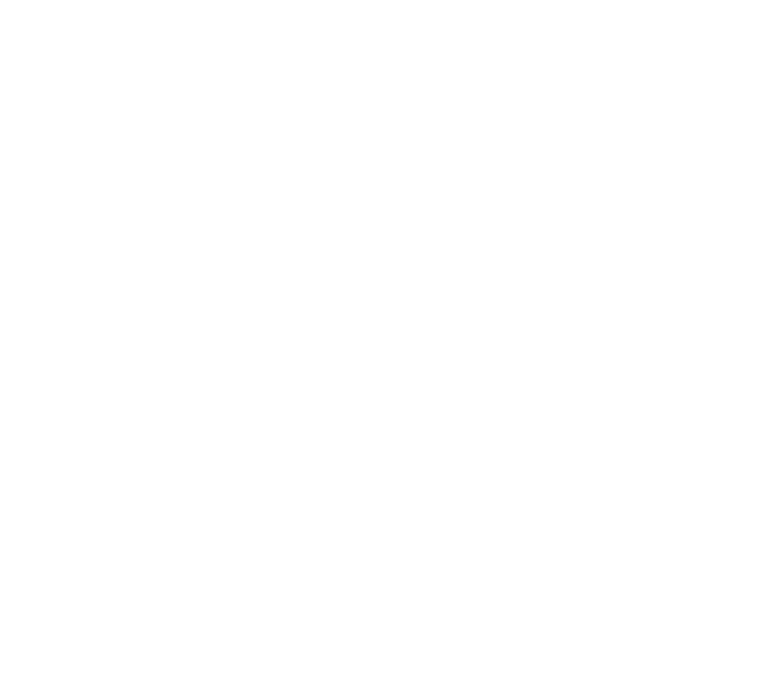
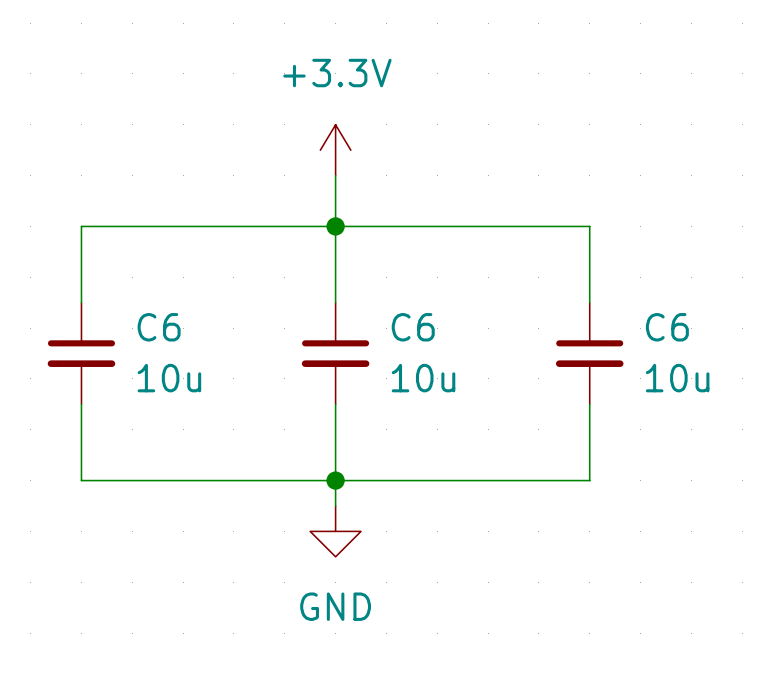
power symbol: none -> +3.3V (335, 150)
wire: none -> (335, 175) (335, 302)
junction: none -> (335, 226)
wire: none -> (81, 302) (81, 226) (589, 226) (589, 302)
C6: none -> 10u (81, 353)
C6: none -> 10u (335, 353)
C6: none -> 10u (589, 353)
wire: none -> (81, 404) (81, 480) (589, 480) (589, 404)
wire: none -> (335, 404) (335, 505)
junction: none -> (335, 480)
power symbol: none -> GND (335, 531)

